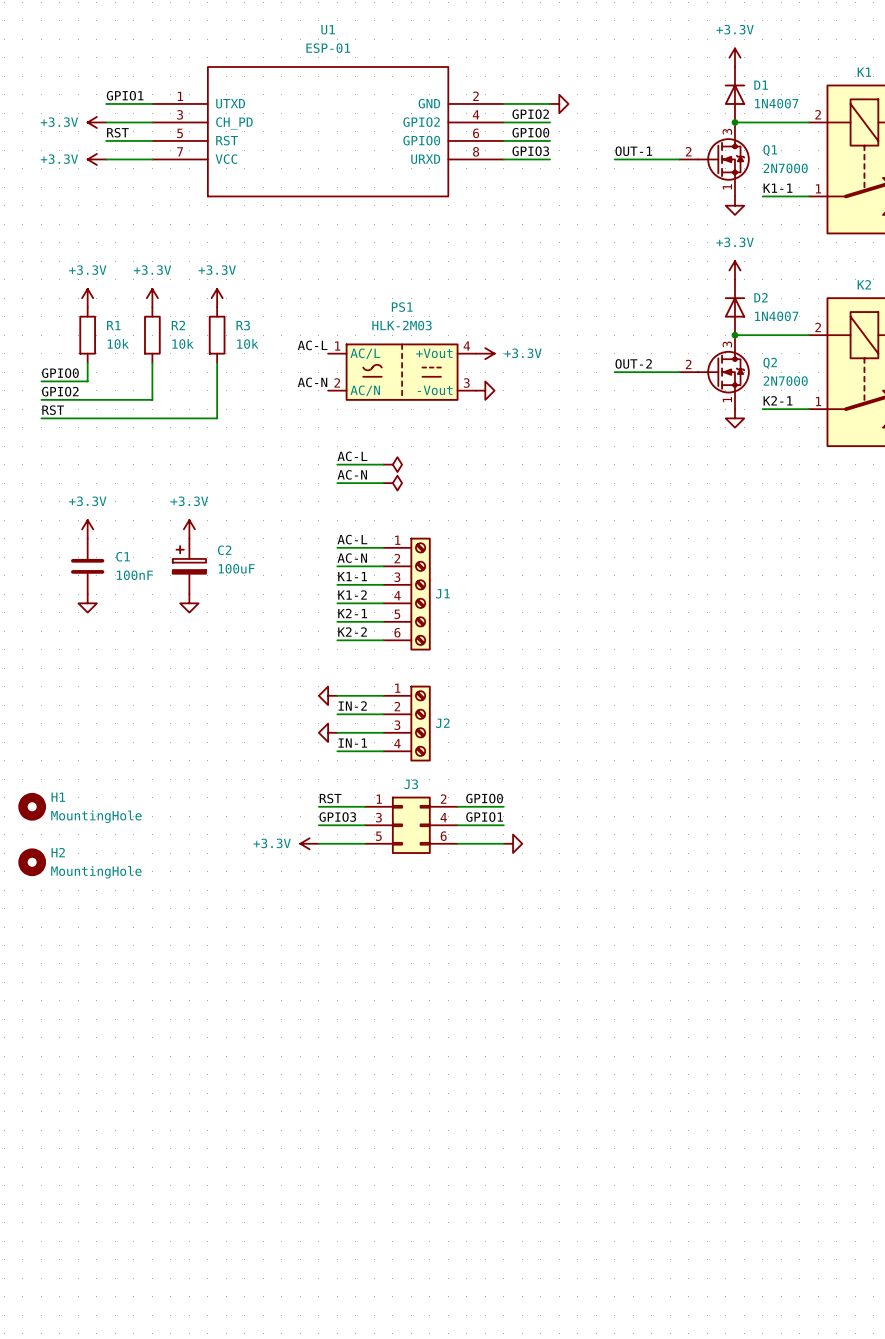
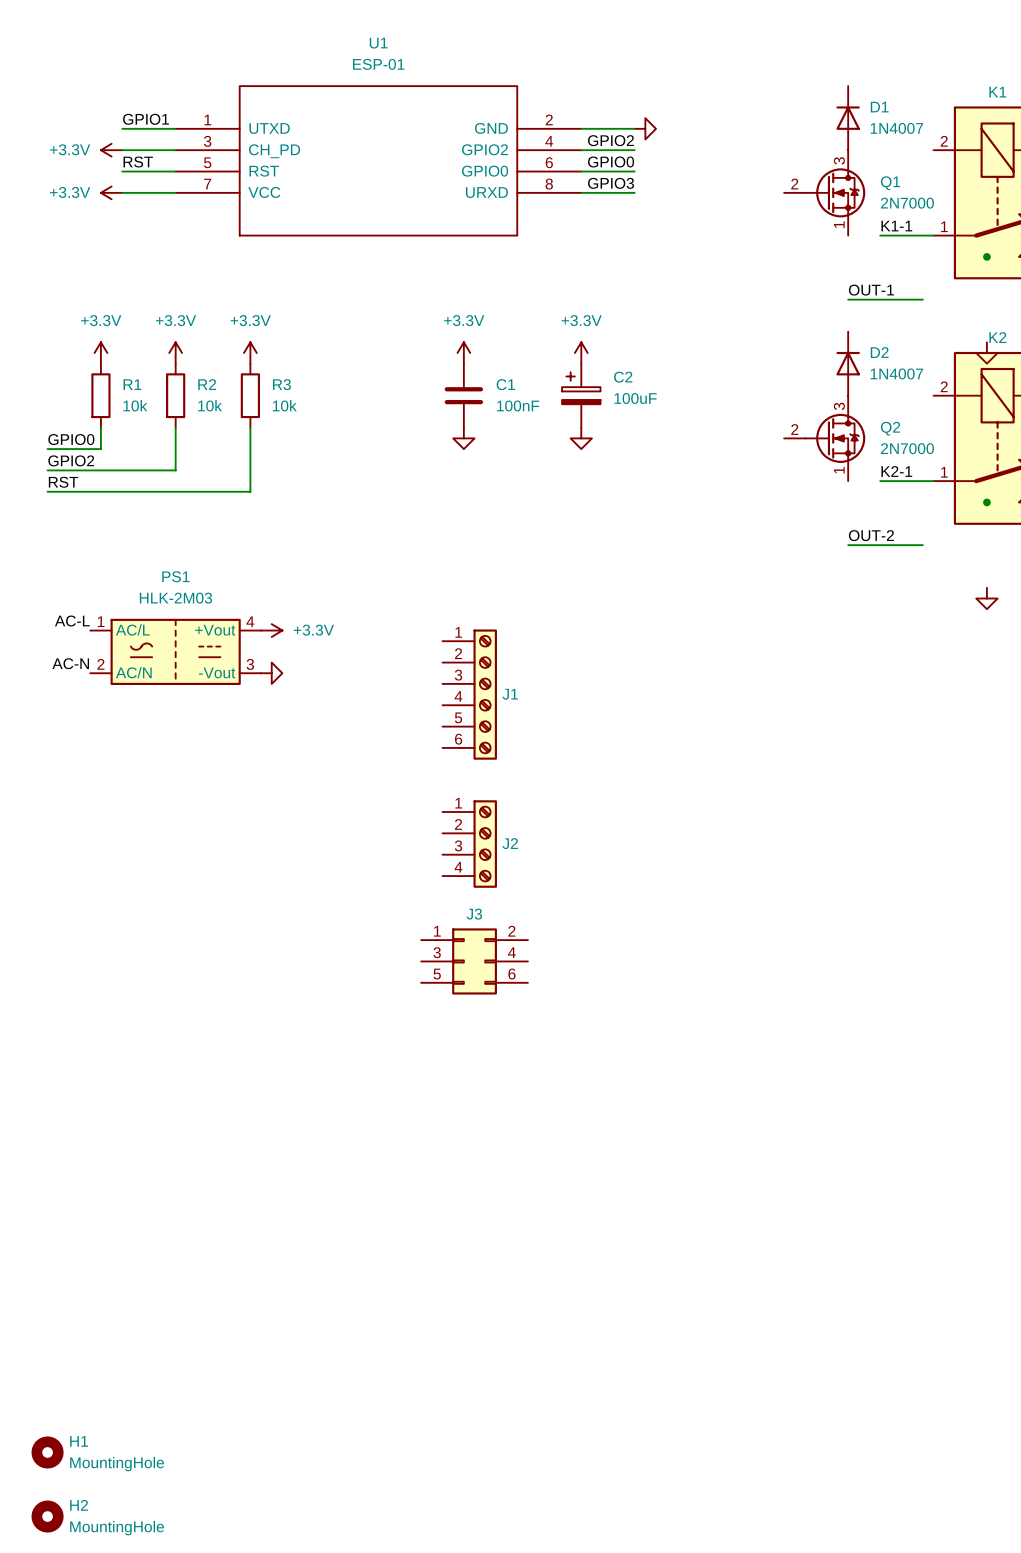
power symbol: +3.3V (734, 57) -> none
wire: (734, 122) (808, 122) -> none
junction: (734, 122) -> none
label position: OUT-1 (633, 151) -> OUT-1 (871, 290)
wire: (614, 159) (679, 159) -> (848, 299) (922, 299)
power symbol: (734, 205) -> none
junction: none -> (986, 256)
power symbol: +3.3V (734, 270) -> none
power symbol: none -> +3.3V (463, 353)
power symbol: none -> +3.3V (581, 353)
power symbol: none -> (986, 353)
wire: (734, 335) (808, 335) -> none
junction: (734, 335) -> none
label: AC-L (312, 345) -> none
power symbol: +3.3V (485, 353) -> none
label position: OUT-2 (633, 363) -> OUT-2 (871, 535)
PS1 position: (402, 372) -> (175, 651)
power symbol: none -> (463, 438)
wire: (614, 372) (679, 372) -> (848, 545) (922, 545)
label: AC-N (312, 382) -> none
power symbol rotation: 0° (485, 390) -> 90° clockwise (581, 438)
power symbol position: (485, 390) -> (581, 438)
power symbol: (734, 418) -> none
junction: none -> (986, 502)
label: AC-L (352, 456) -> none
wire: (337, 464) (383, 464) -> none
power symbol: (392, 464) -> none
label: AC-N (352, 474) -> none
wire: (337, 483) (383, 483) -> none
power symbol: (392, 483) -> none
power symbol text position: +3.3V (189, 501) -> +3.3V (313, 630)
power symbol: none -> (986, 598)
power symbol: +3.3V (87, 529) -> none
power symbol rotation: 0° (189, 529) -> 90° clockwise (271, 630)
power symbol position: +3.3V (189, 529) -> +3.3V (271, 630)
label: none -> AC-L (72, 621)
label: AC-L (352, 539) -> none
wire: (337, 547) (383, 547) -> none
label: AC-N (352, 558) -> none
C1 position: (87, 566) -> (463, 395)
C2 position: (189, 566) -> (581, 395)
wire: (337, 566) (383, 566) -> none
label: none -> AC-N (70, 663)
label: K1-1 (352, 576) -> none
wire: (337, 584) (383, 584) -> none
label: K1-2 (352, 595) -> none
power symbol: (87, 603) -> none
power symbol rotation: 0° (189, 603) -> 90° counterclockwise (271, 673)
power symbol position: (189, 603) -> (271, 673)
wire: (337, 603) (383, 603) -> none
label: K2-1 (352, 613) -> none
wire: (337, 621) (383, 621) -> none
label: K2-2 (352, 631) -> none
wire: (337, 640) (383, 640) -> none
power symbol: (328, 695) -> none
wire: (337, 695) (383, 695) -> none
label: IN-2 (352, 705) -> none
wire: (337, 714) (383, 714) -> none
power symbol: (328, 732) -> none
wire: (337, 732) (383, 732) -> none
label: IN-1 (352, 743) -> none
wire: (337, 751) (383, 751) -> none
label: RST (330, 798) -> none
label: GPIO0 (484, 798) -> none
H1 position: (32, 806) -> (47, 1452)
wire: (318, 806) (365, 806) -> none
wire: (457, 806) (503, 806) -> none
label: GPIO3 (337, 817) -> none
label: GPIO1 (484, 817) -> none
wire: (318, 825) (365, 825) -> none
wire: (457, 825) (503, 825) -> none
power symbol: +3.3V (309, 843) -> none
wire: (318, 843) (365, 843) -> none
wire: (457, 843) (503, 843) -> none
power symbol: (513, 843) -> none
H2 position: (32, 862) -> (47, 1516)

